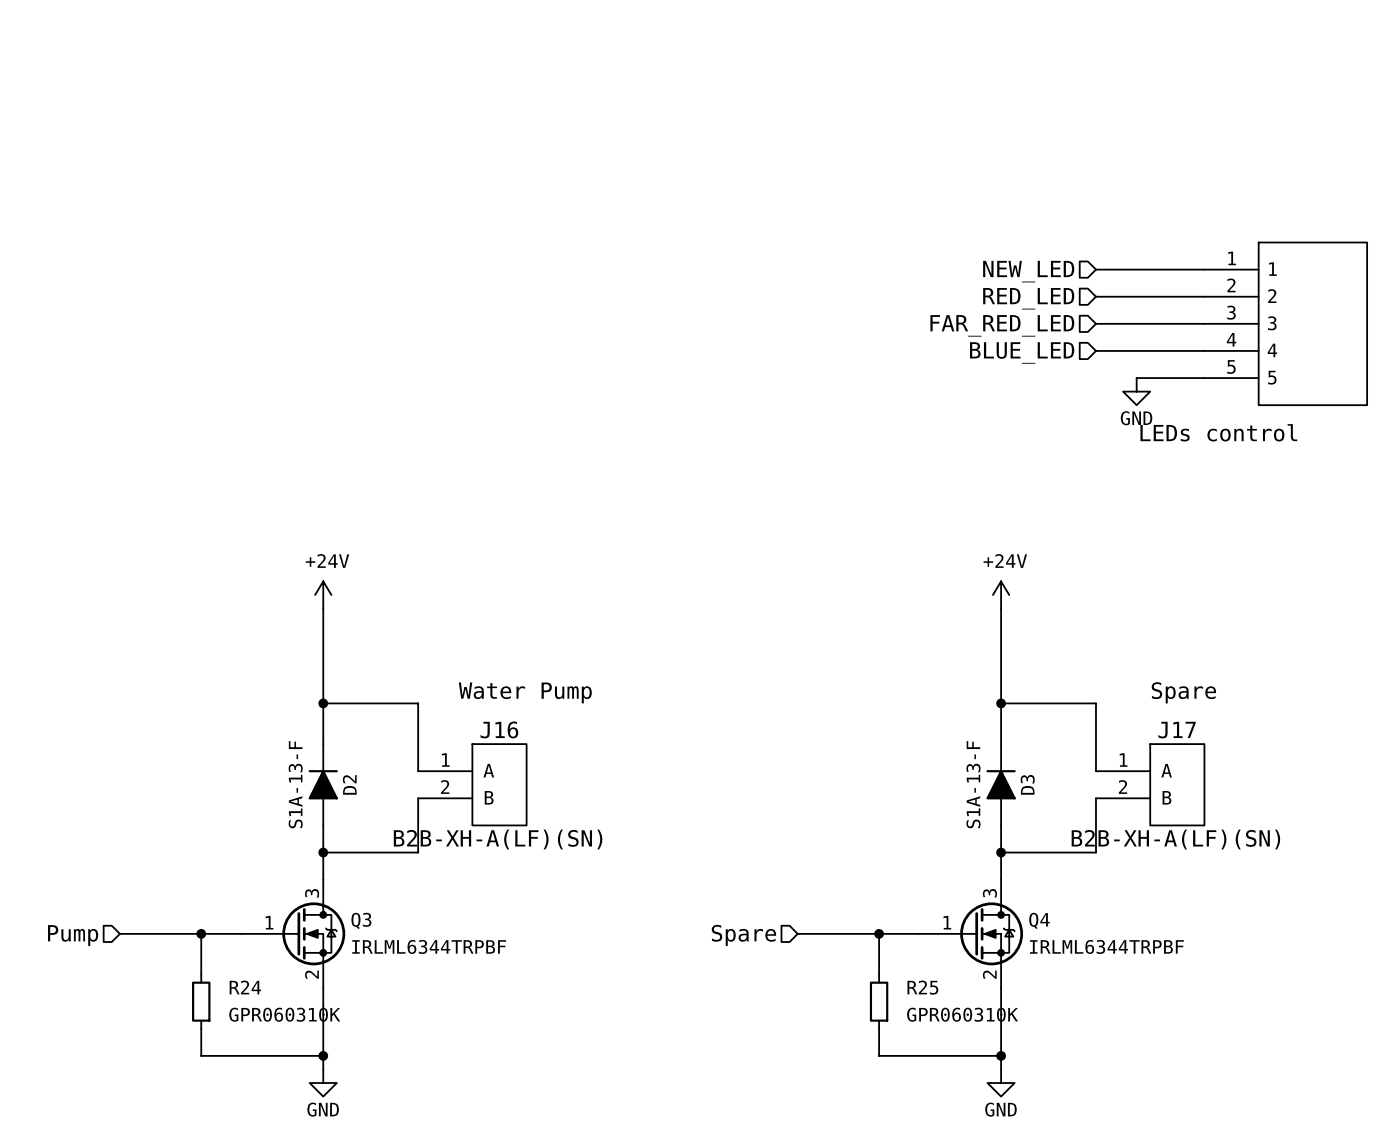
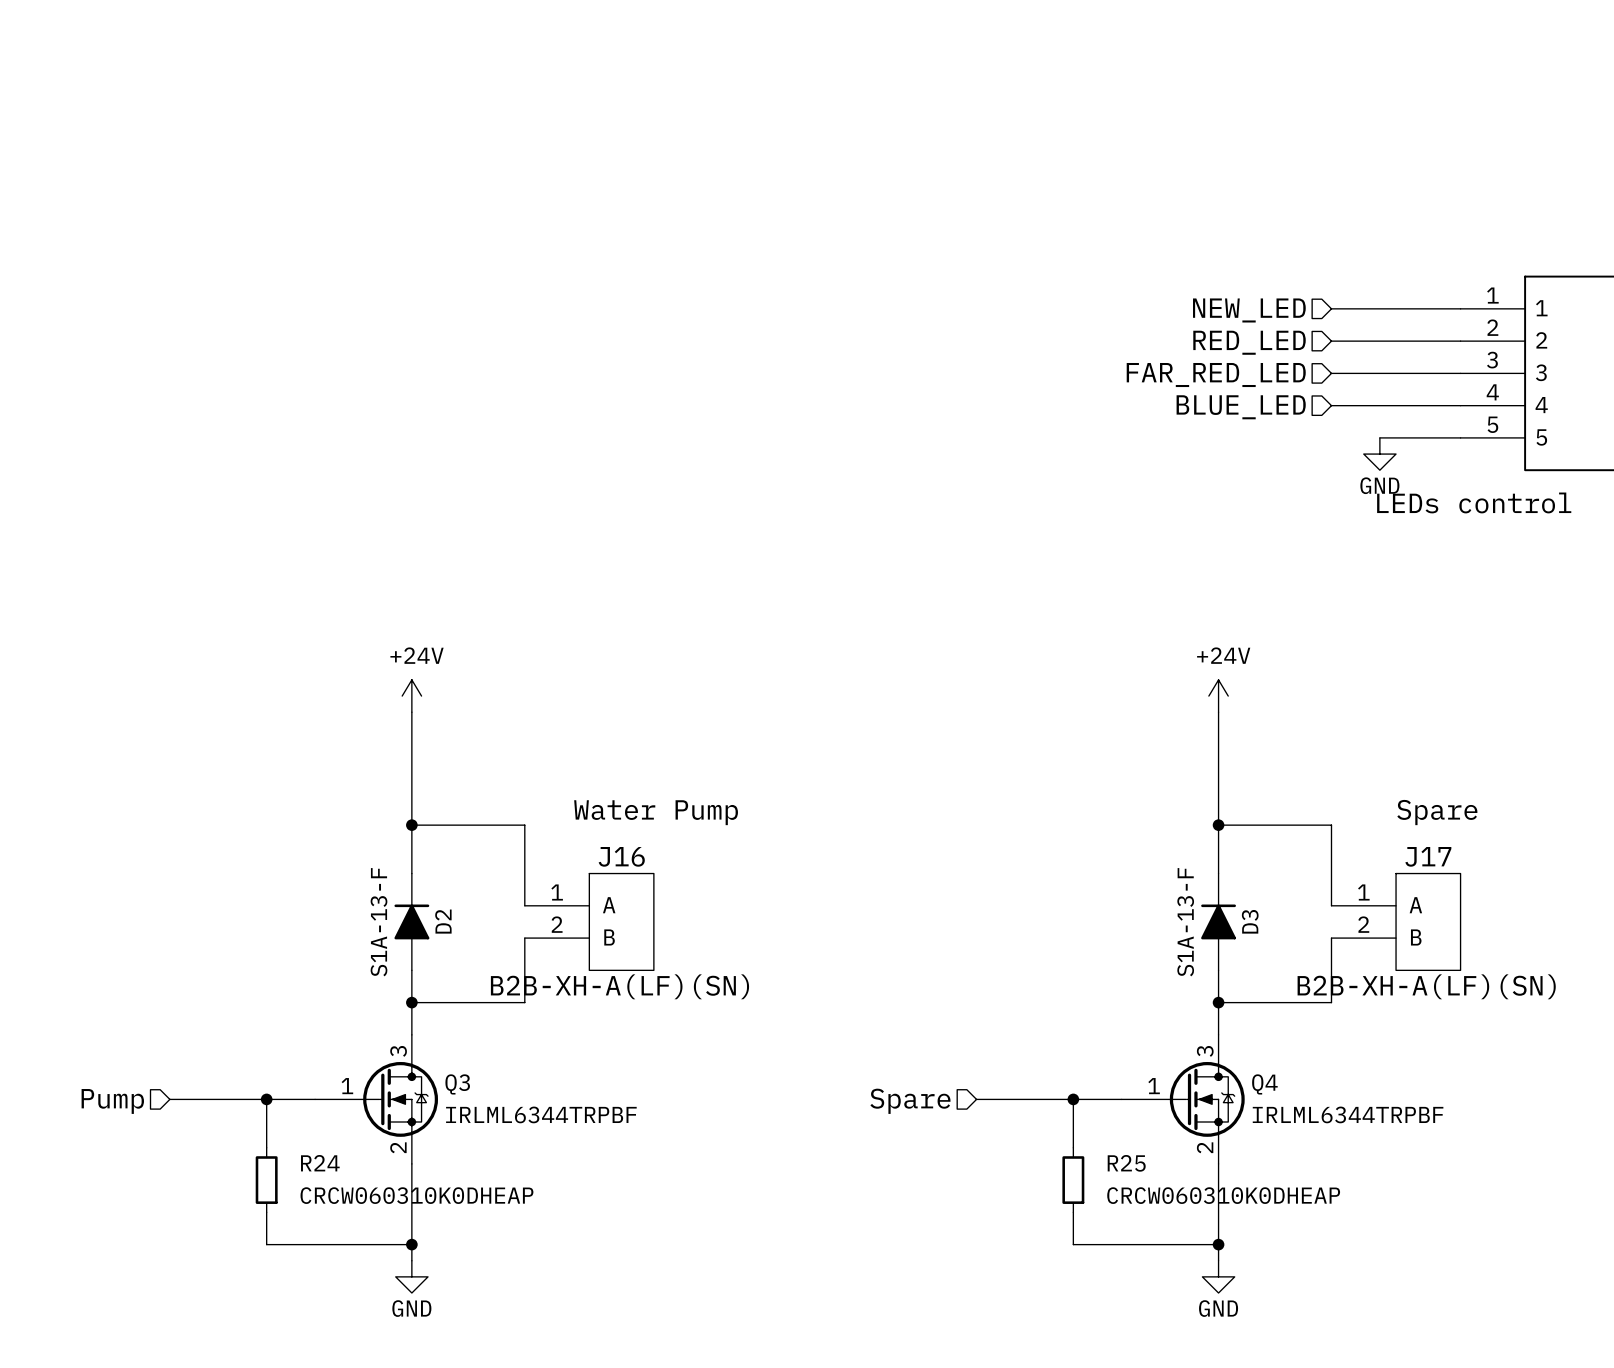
R24 value: GPR060310K (284, 1014) -> CRCW060310K0DHEAP (416, 1195)
R25 value: GPR060310K (962, 1014) -> CRCW060310K0DHEAP (1223, 1195)

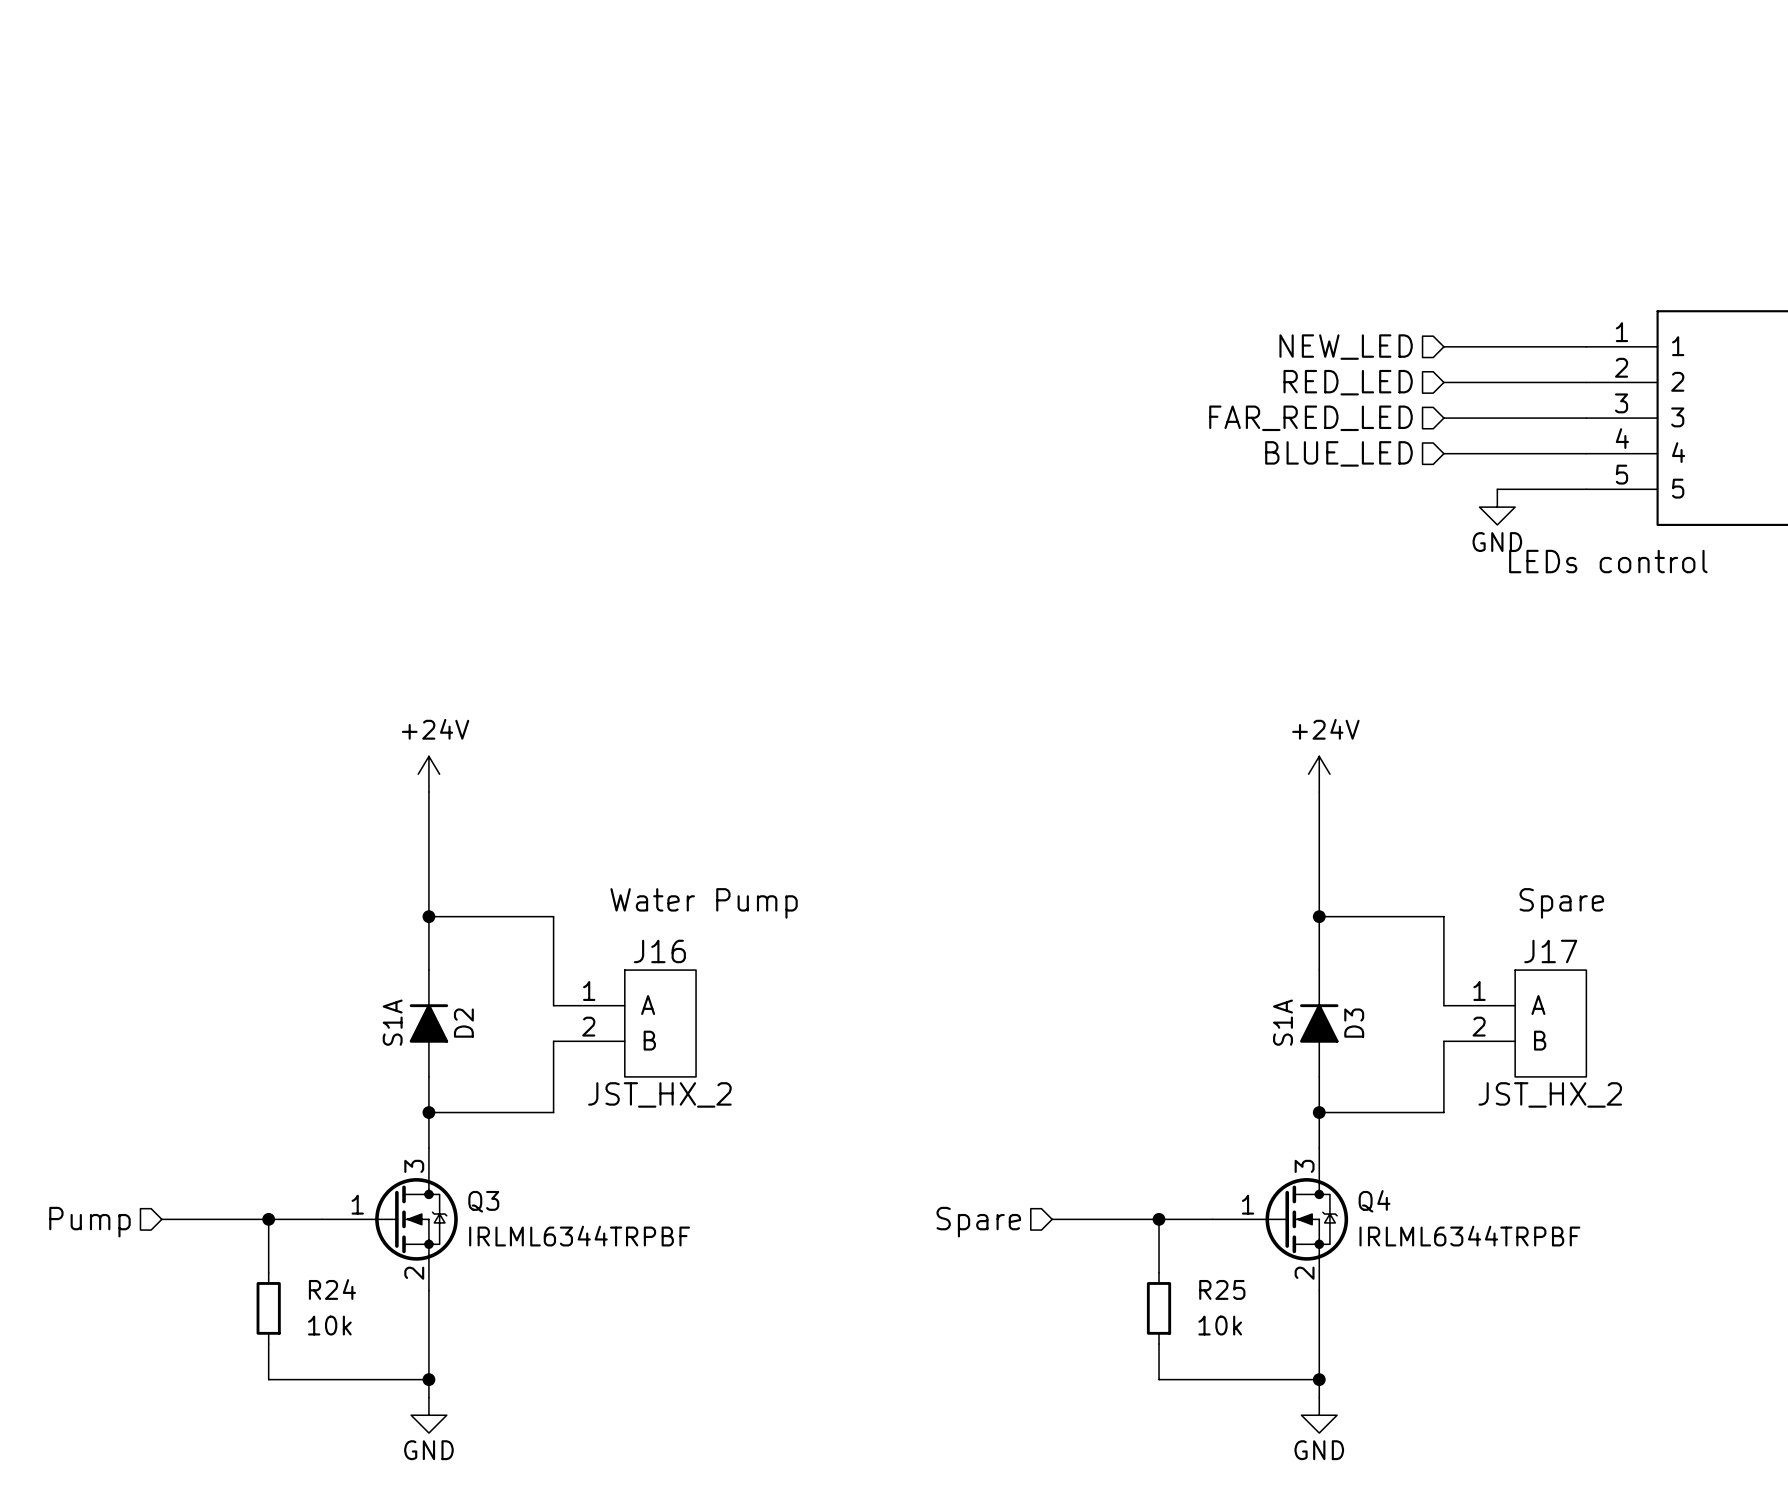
D2 value: S1A-13-F (379, 922) -> S1A (392, 1022)
D3 value: S1A-13-F (1185, 922) -> S1A (1282, 1022)
J16 value: B2B-XH-A(LF)(SN) (619, 986) -> JST_HX_2 (659, 1094)
J17 value: B2B-XH-A(LF)(SN) (1426, 986) -> JST_HX_2 (1550, 1094)
R24 value: CRCW060310K0DHEAP (416, 1195) -> 10k (329, 1325)
R25 value: CRCW060310K0DHEAP (1223, 1195) -> 10k (1220, 1325)

